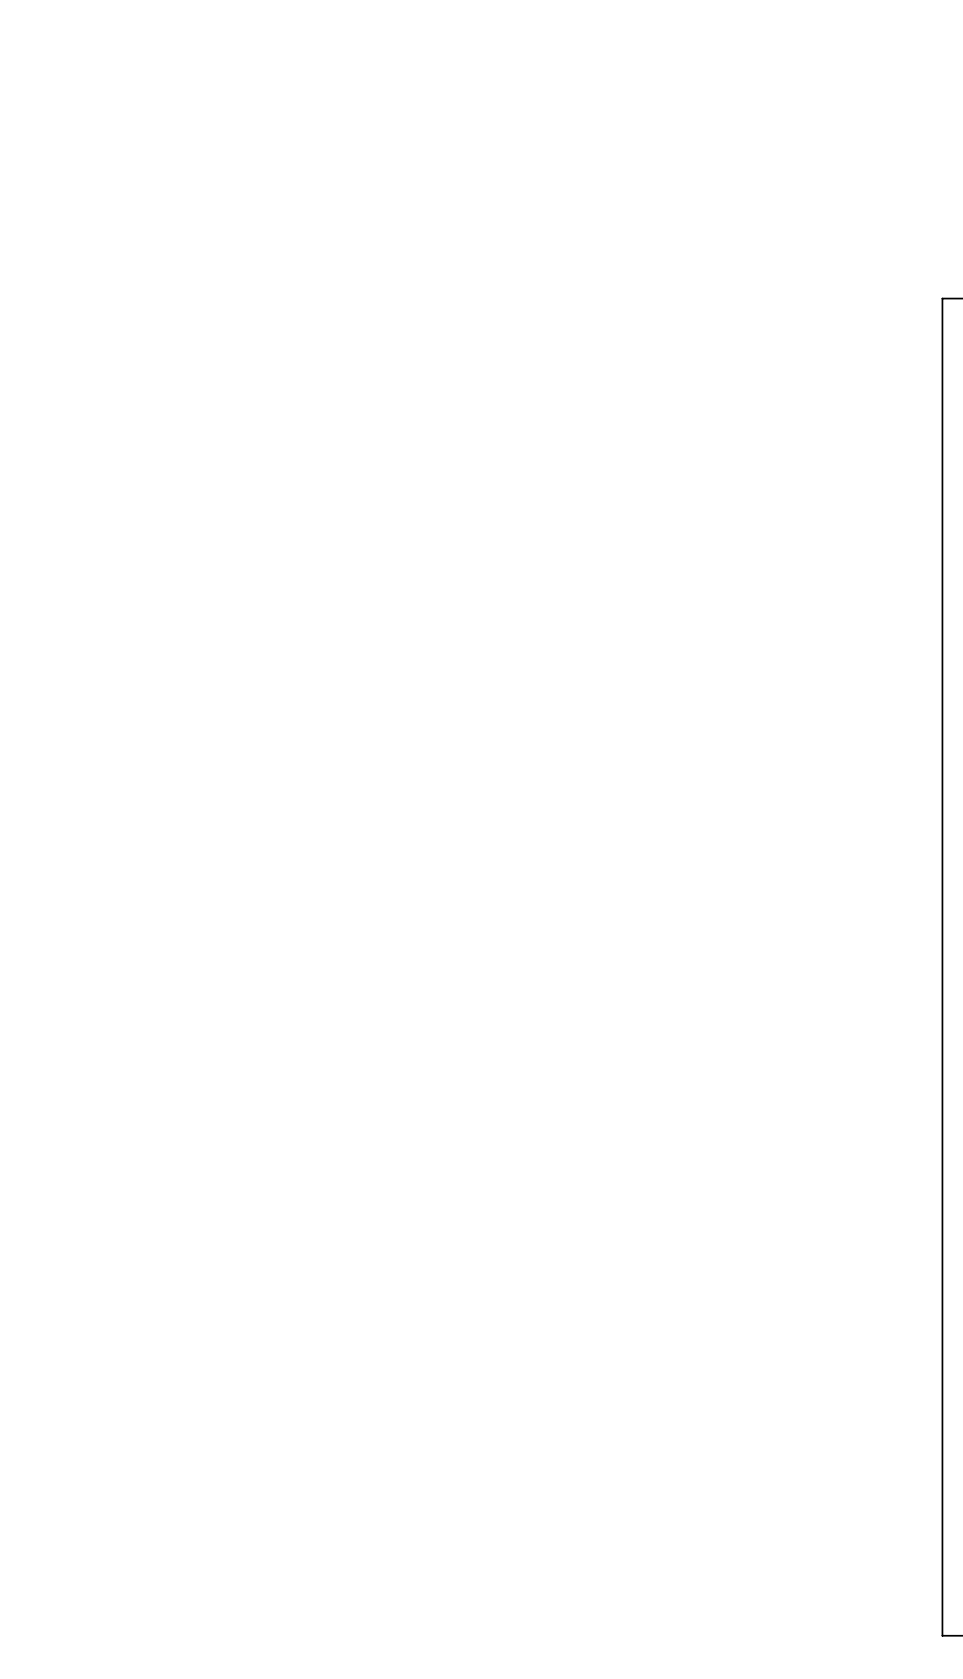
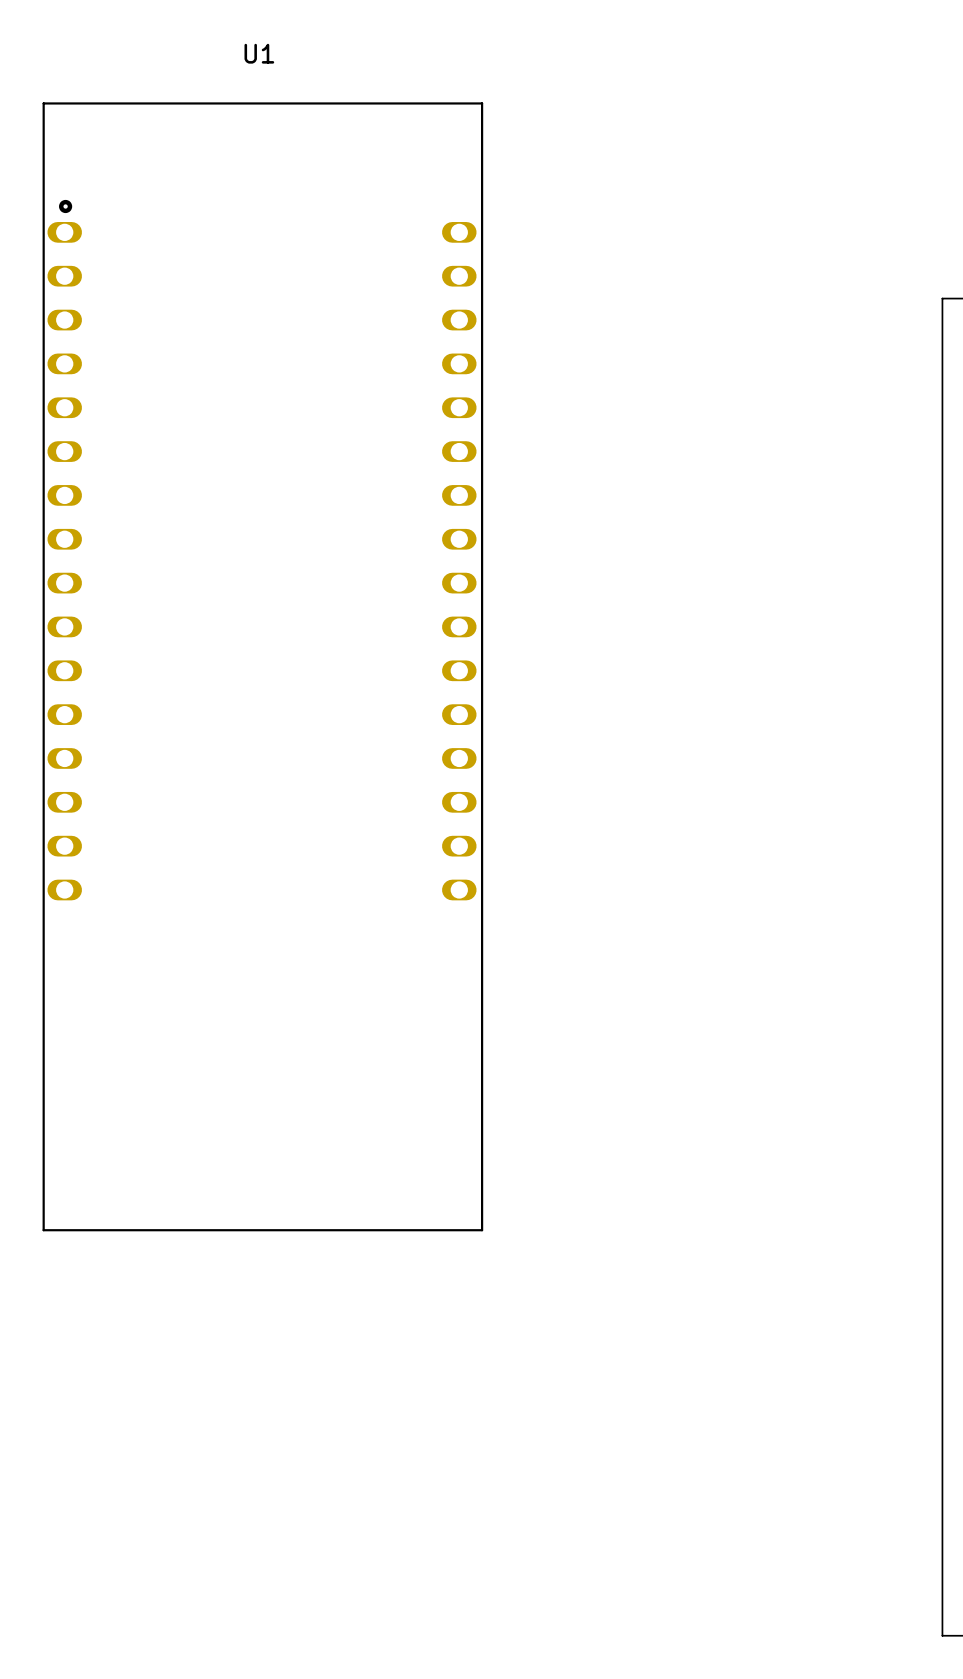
U1: none -> (262, 666)

